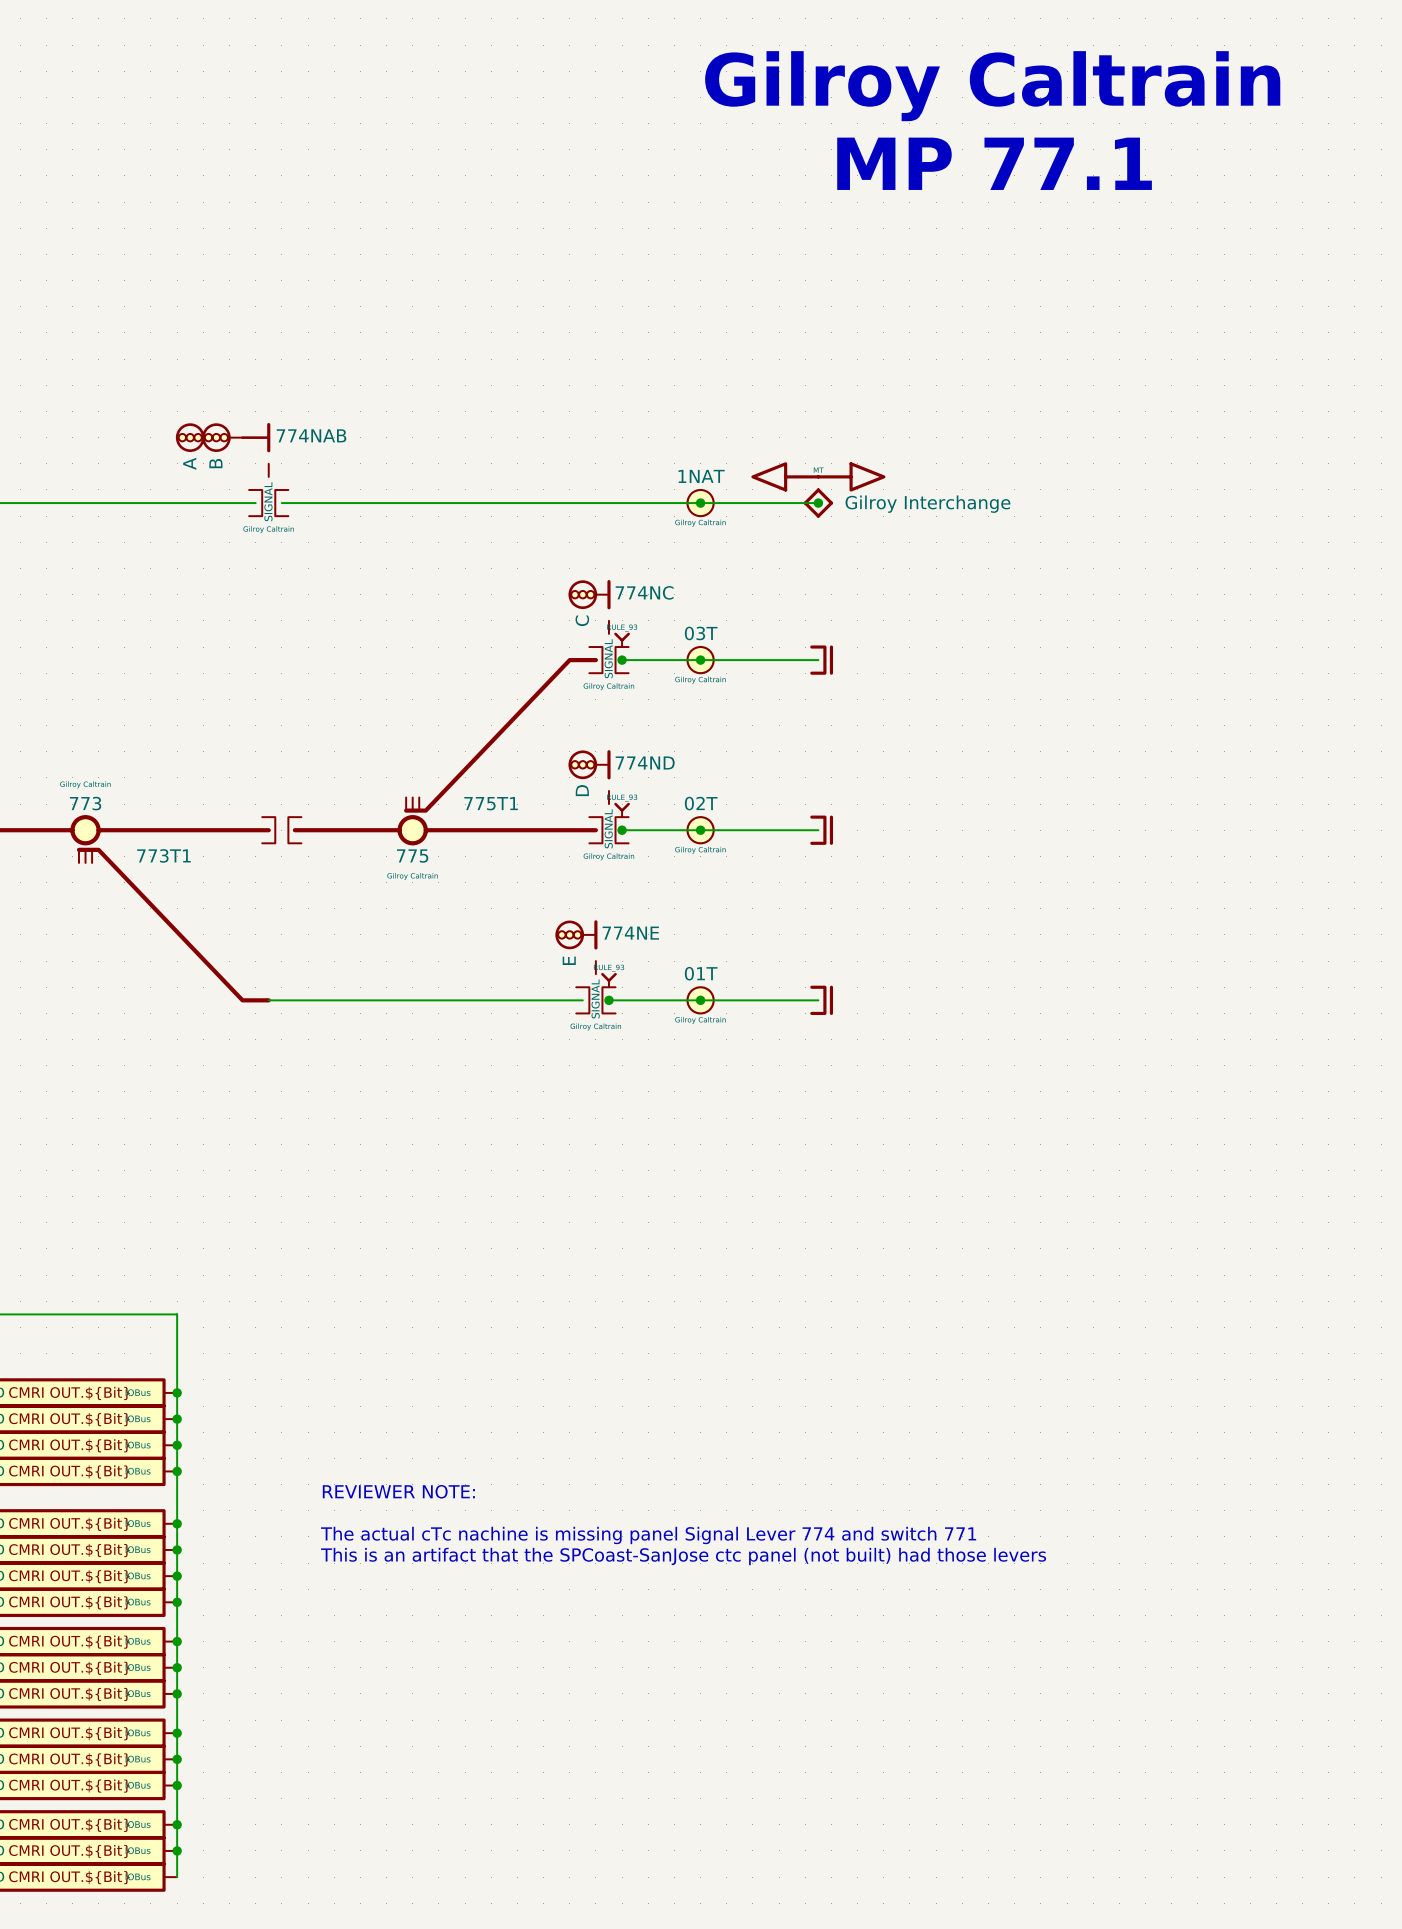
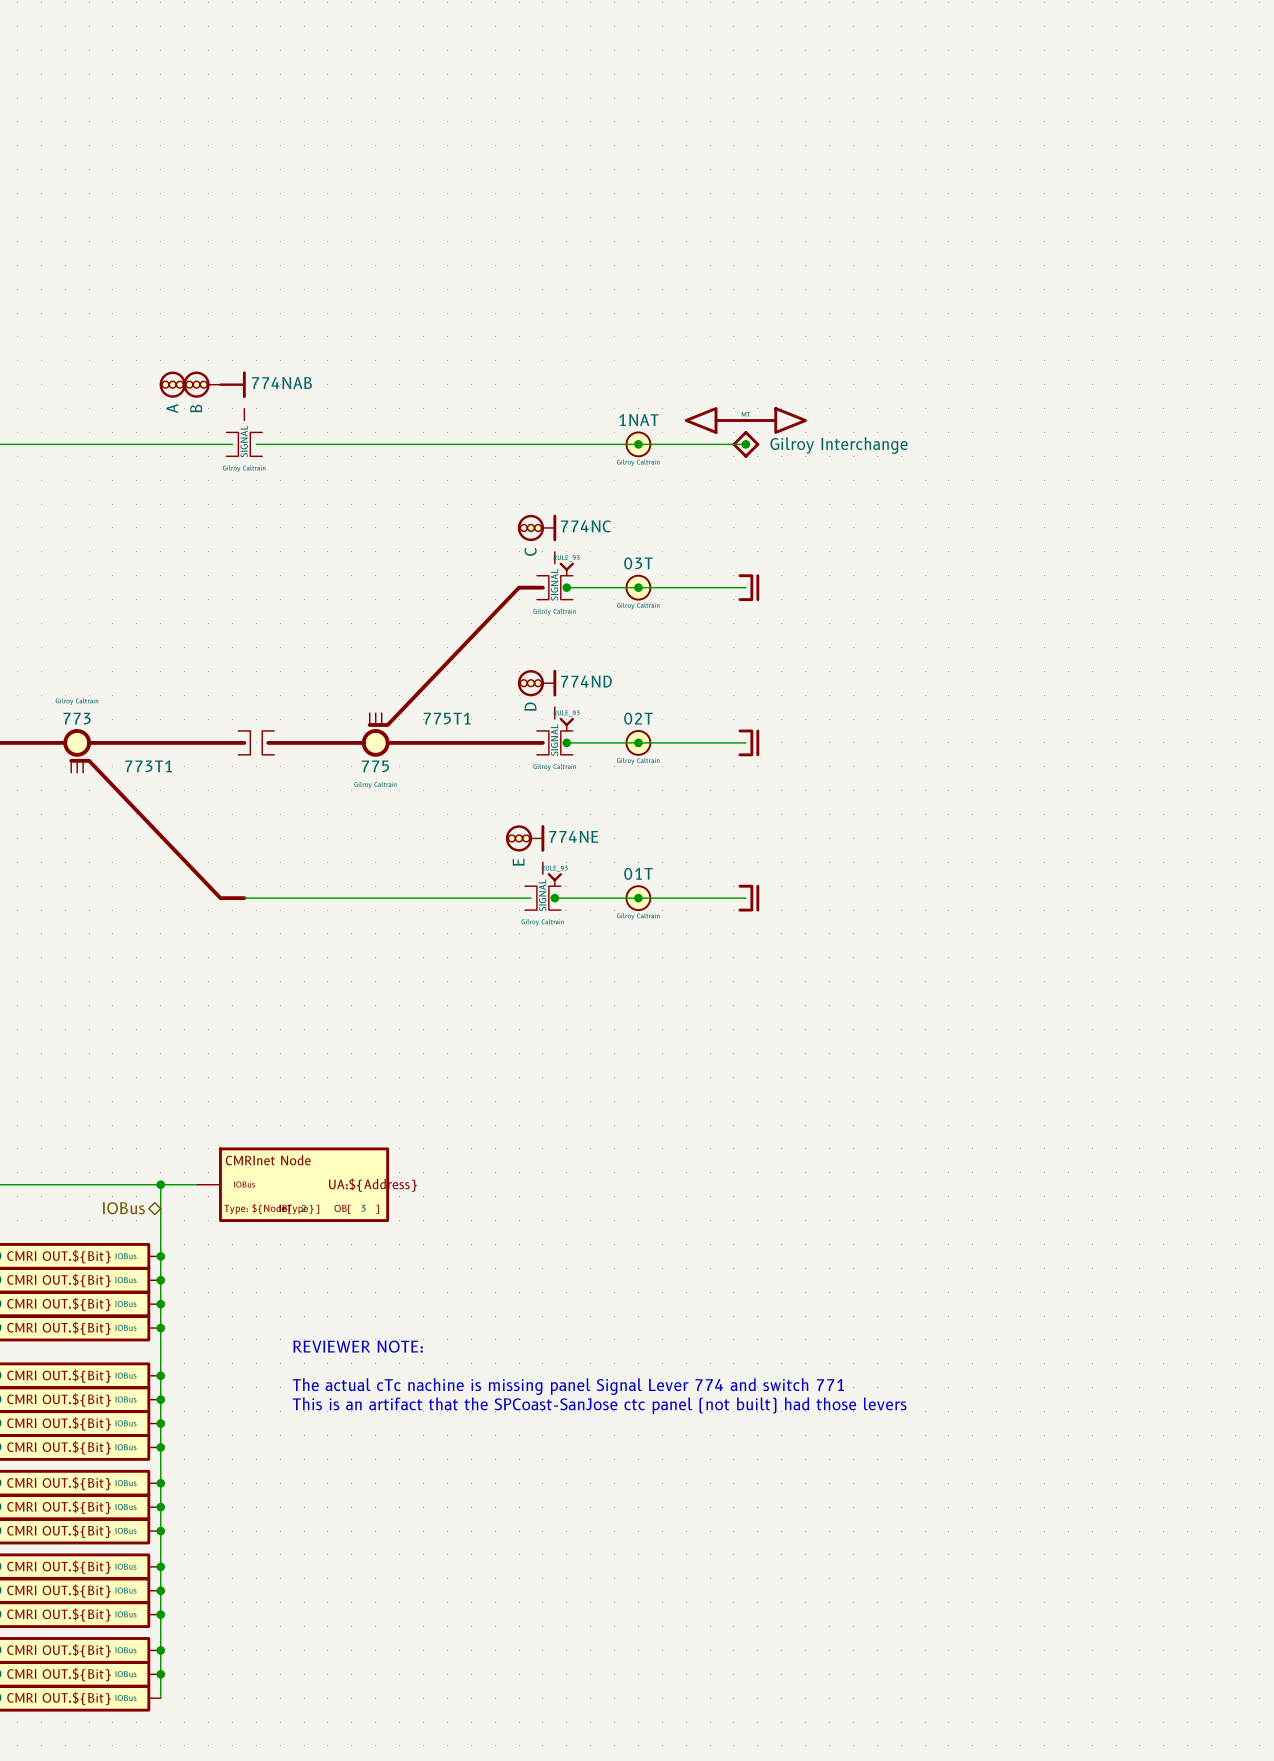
text: Gilroy Caltrain (992, 86) -> none
text: MP 77.1 (994, 163) -> none
wire: none -> (160, 1184) (196, 1184)
junction: none -> (160, 1184)
part: none -> (292, 1184)
hierarchical label: none -> IOBus (123, 1208)

